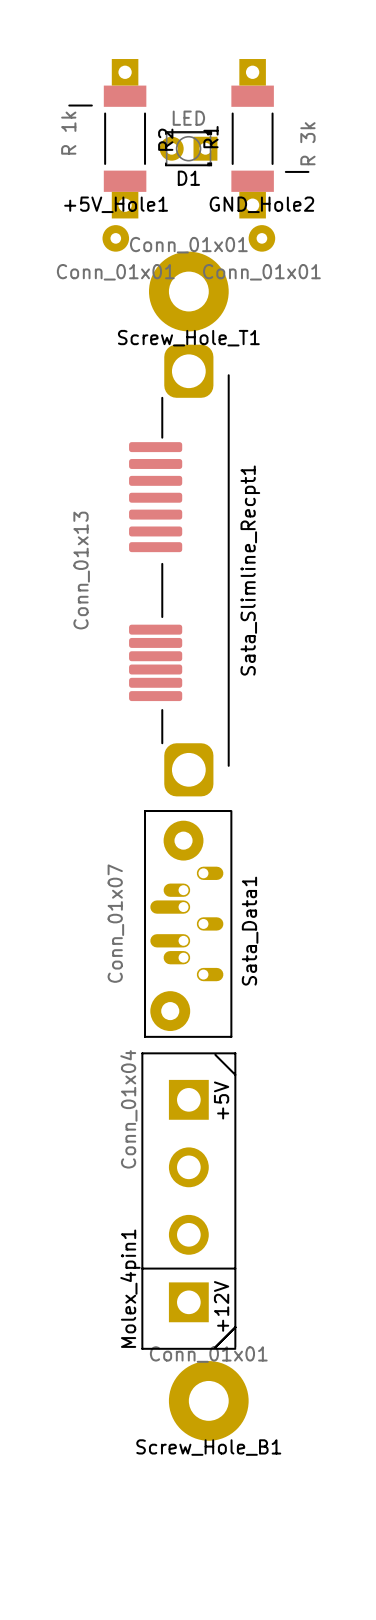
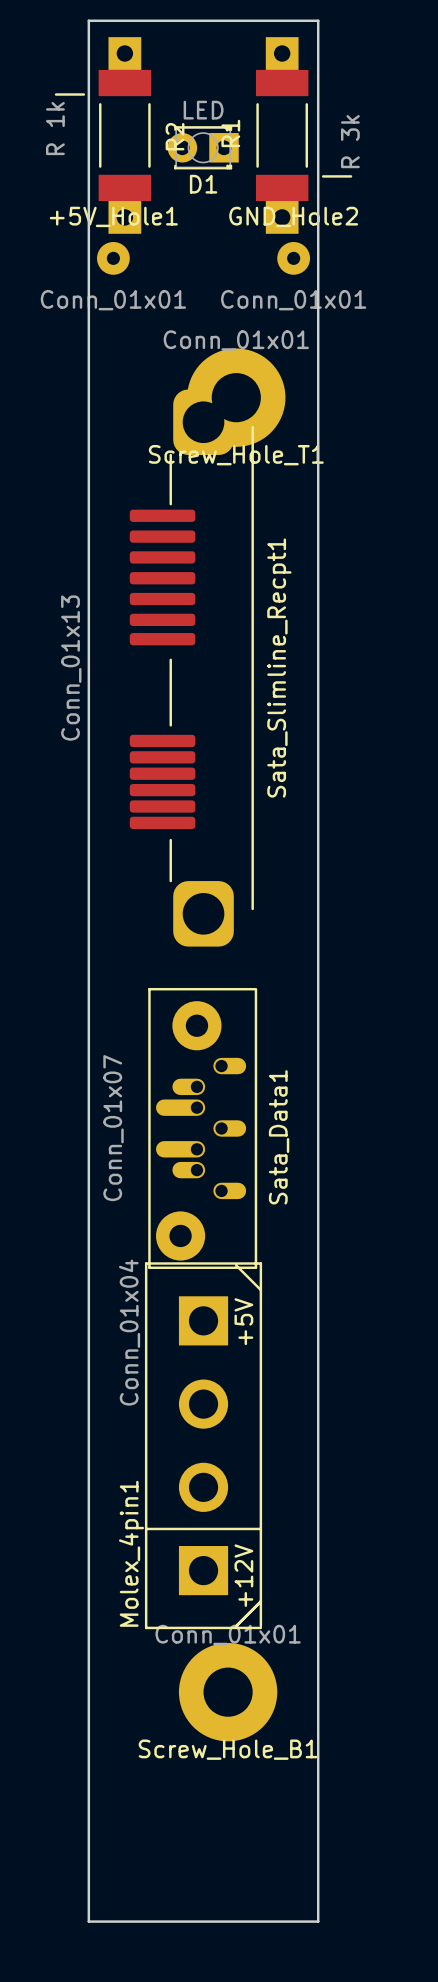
board edge: none -> (88, 20) (318, 20) (318, 1921) (88, 1921) (88, 20)
Screw_Hole_T1 position: (188, 291) -> (236, 397)
Sata_Data1 position: (188, 923) -> (202, 1128)

